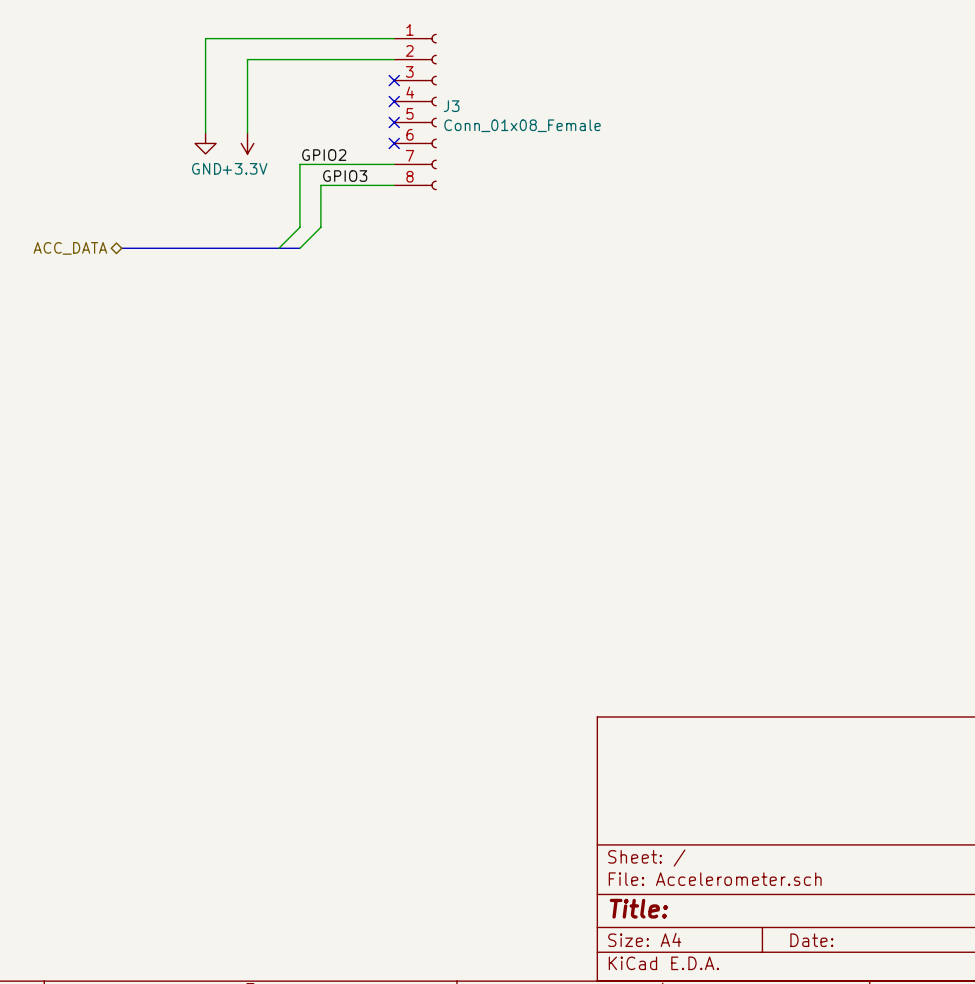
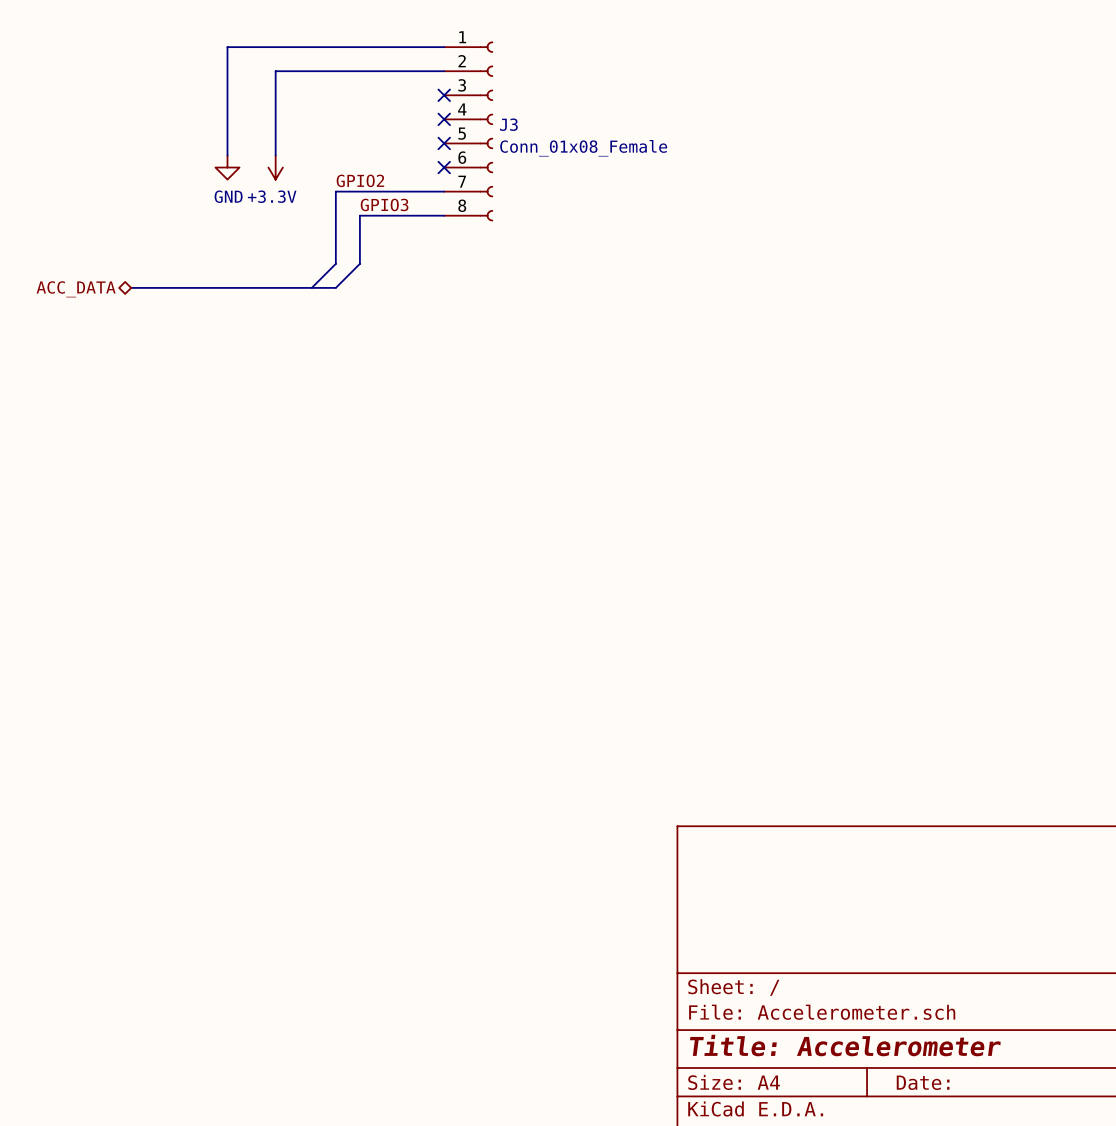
title block: Title: (638, 908) -> Title: Accelerometer (845, 1045)

